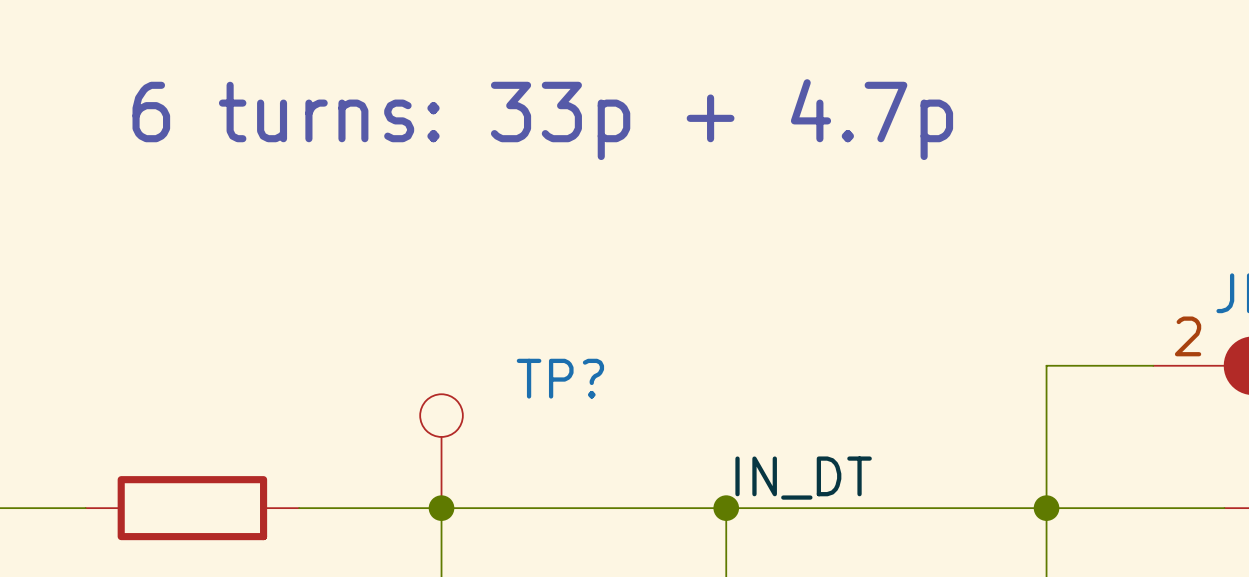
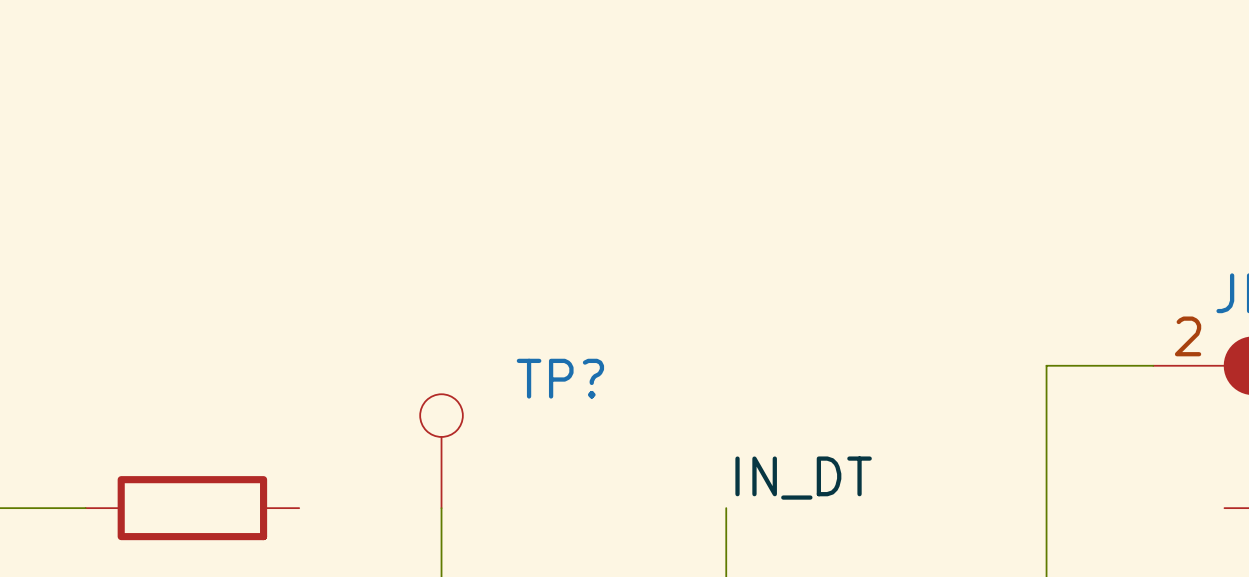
text: 6 turns: 33p + 4.7p (542, 119) -> none
wire: (299, 508) (1224, 508) -> none
junction: (441, 508) -> none
junction: (726, 508) -> none
junction: (1046, 508) -> none

